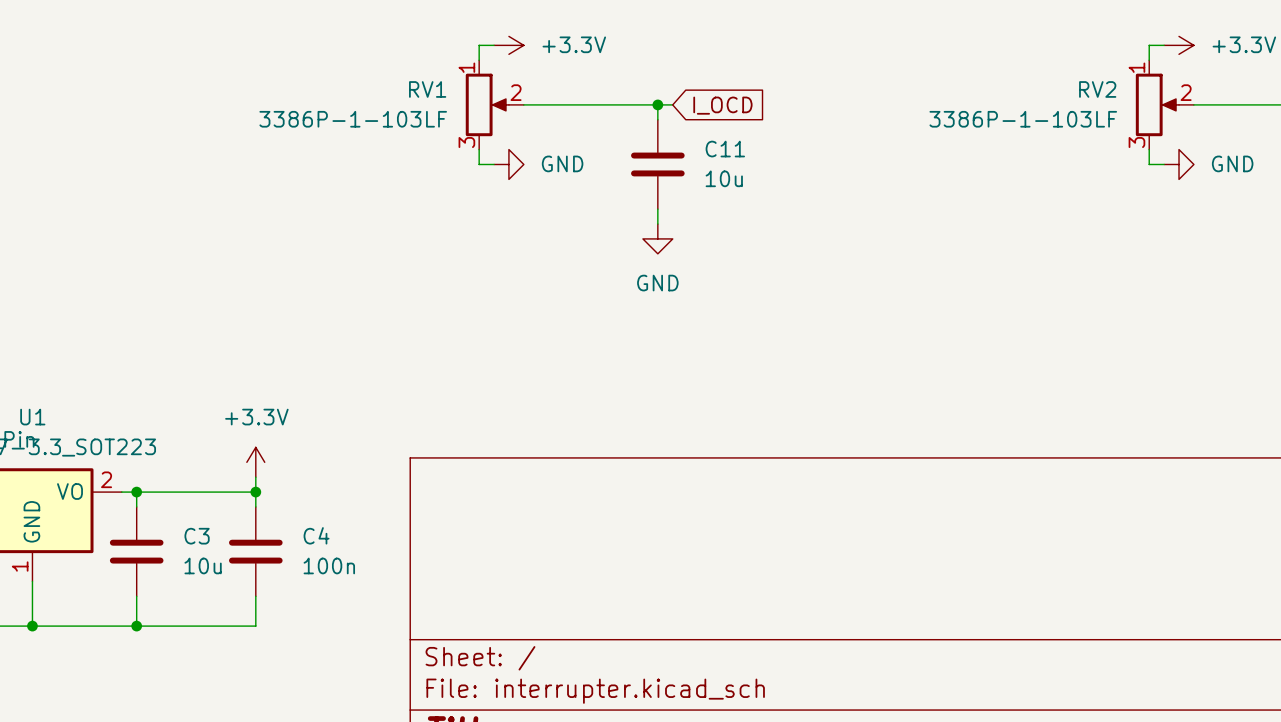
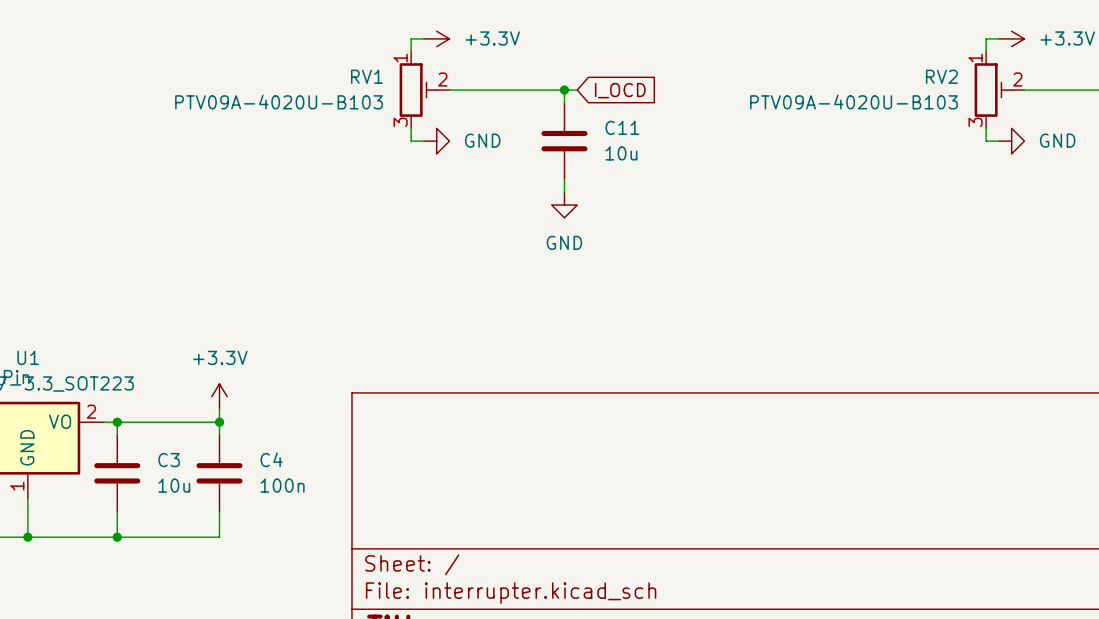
RV1 symbol: [465, 60, 524, 150] -> [399, 51, 450, 129]
RV2 symbol: [1135, 60, 1194, 150] -> [974, 51, 1025, 129]
RV1 value: 3386P-1-103LF (353, 119) -> PTV09A-4020U-B103 (279, 102)
RV2 value: 3386P-1-103LF (1023, 119) -> PTV09A-4020U-B103 (853, 102)

